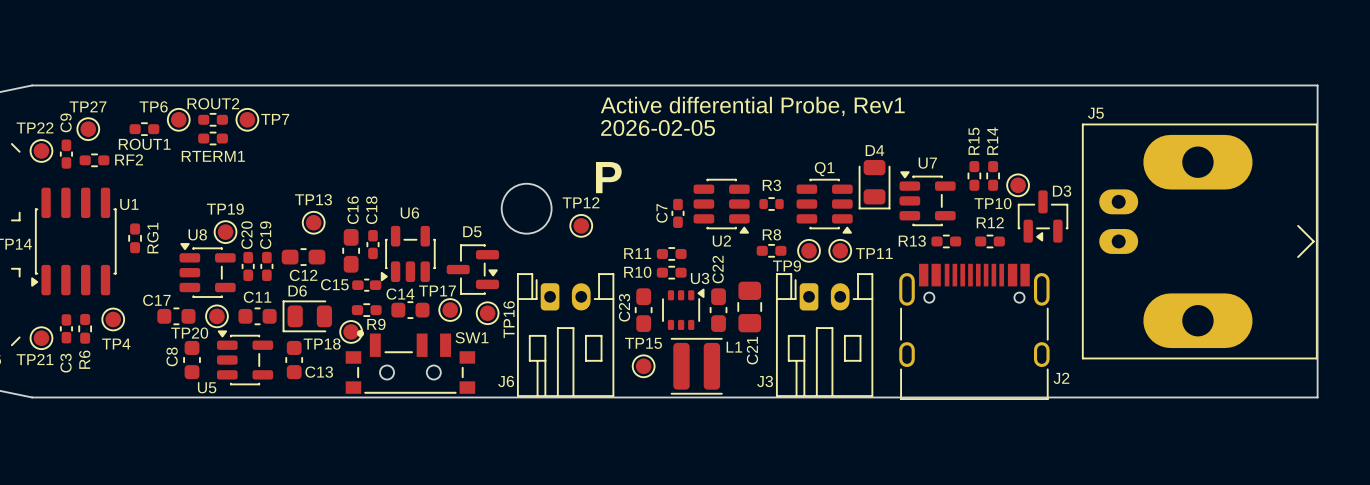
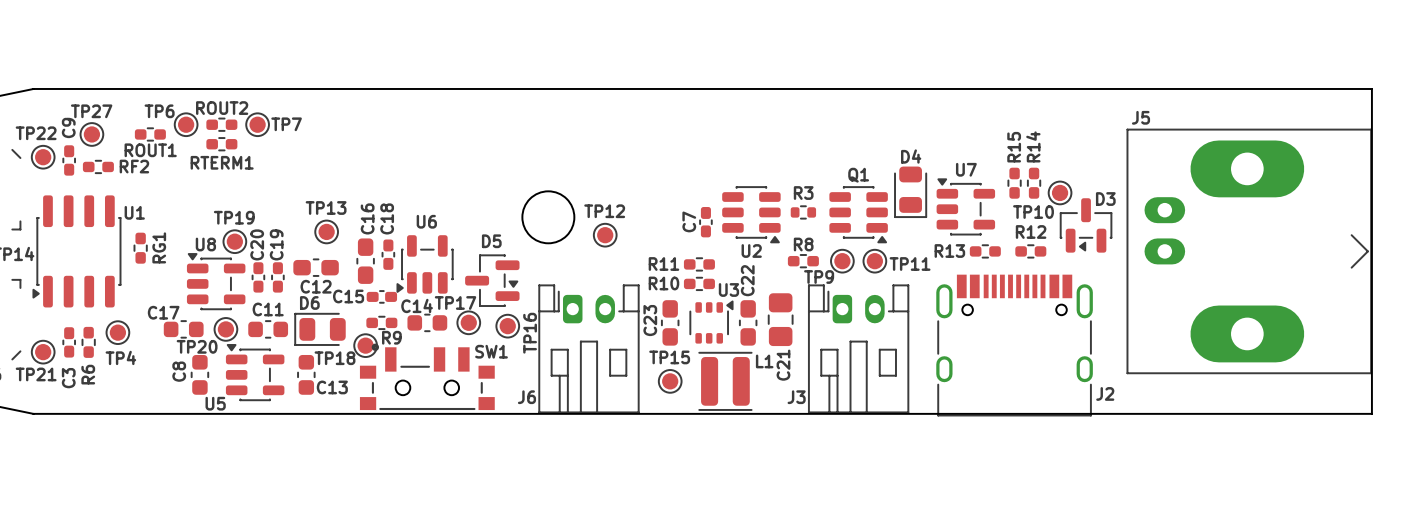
text: Active differential Probe, Rev1 (752, 106) -> none
text: 2026-02-05 (658, 128) -> none
text: P (608, 177) -> none

